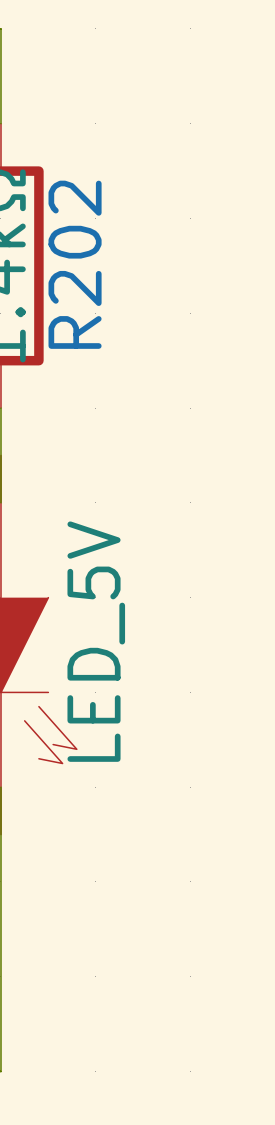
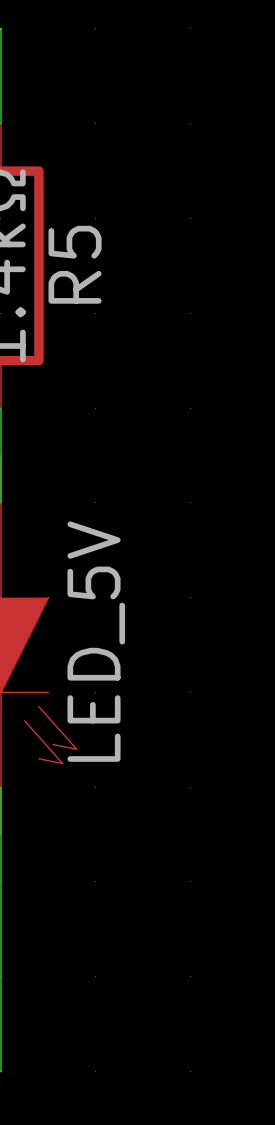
R202 name: R202 (75, 264) -> R5 (75, 264)

